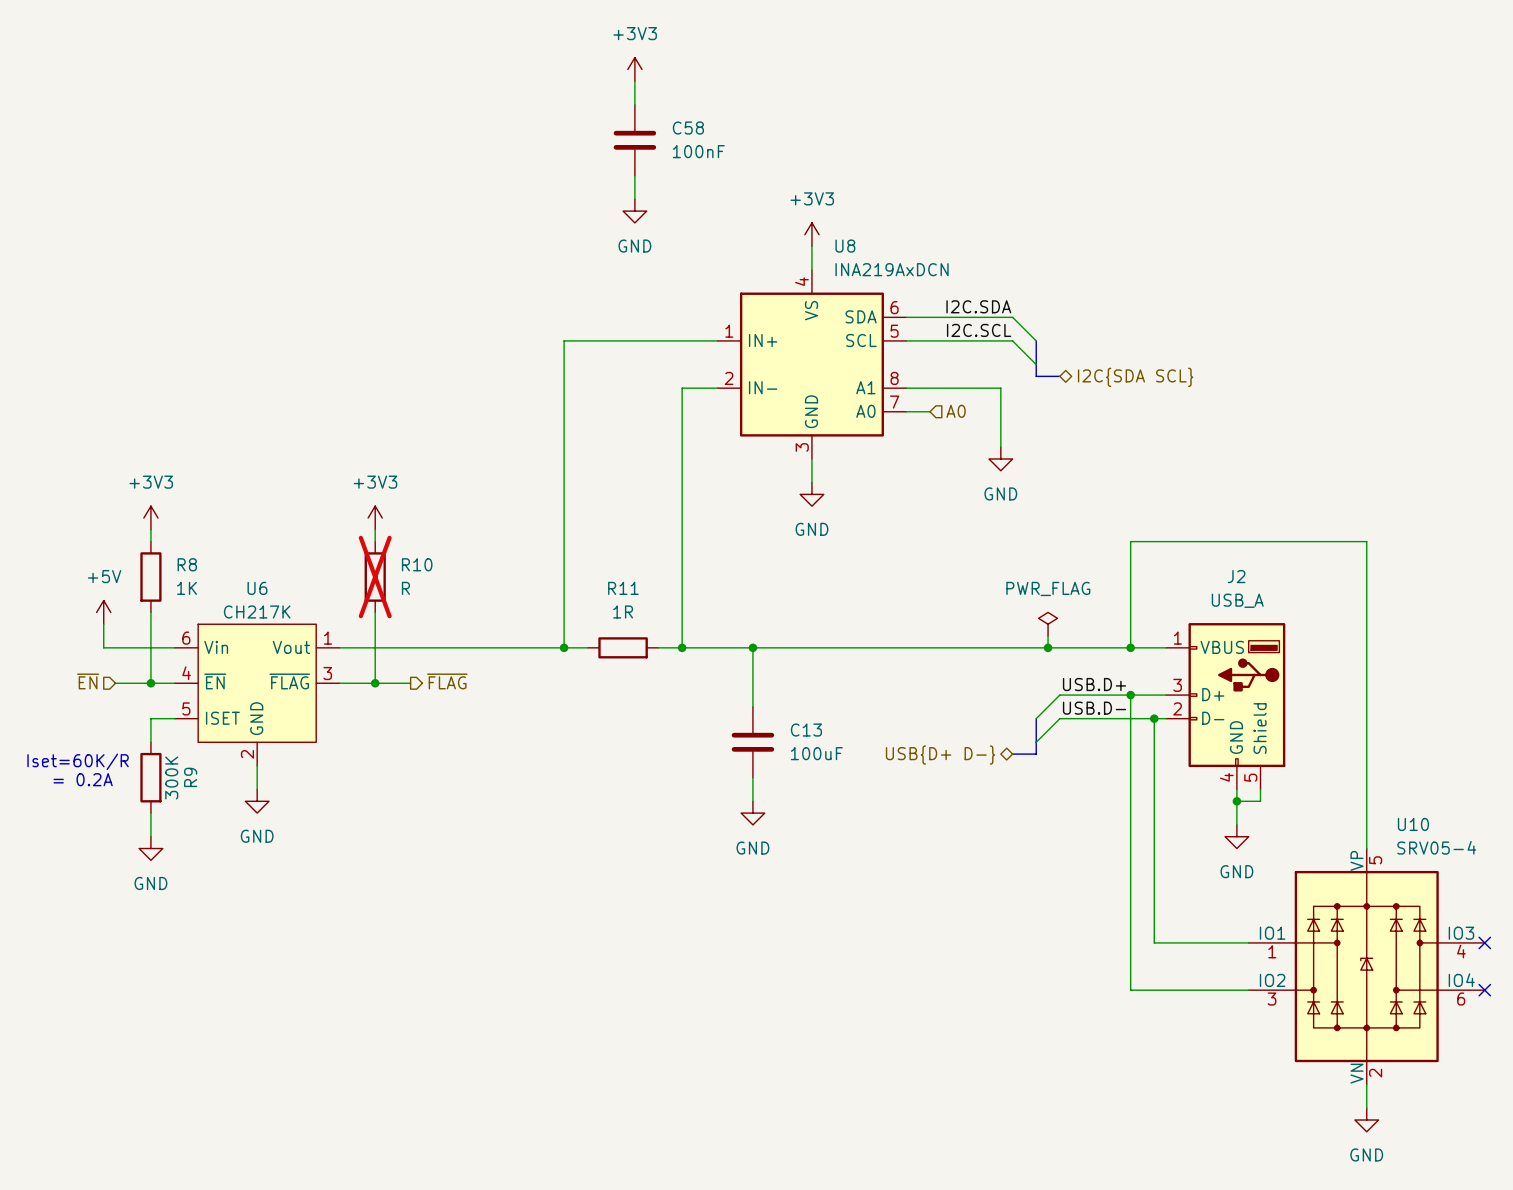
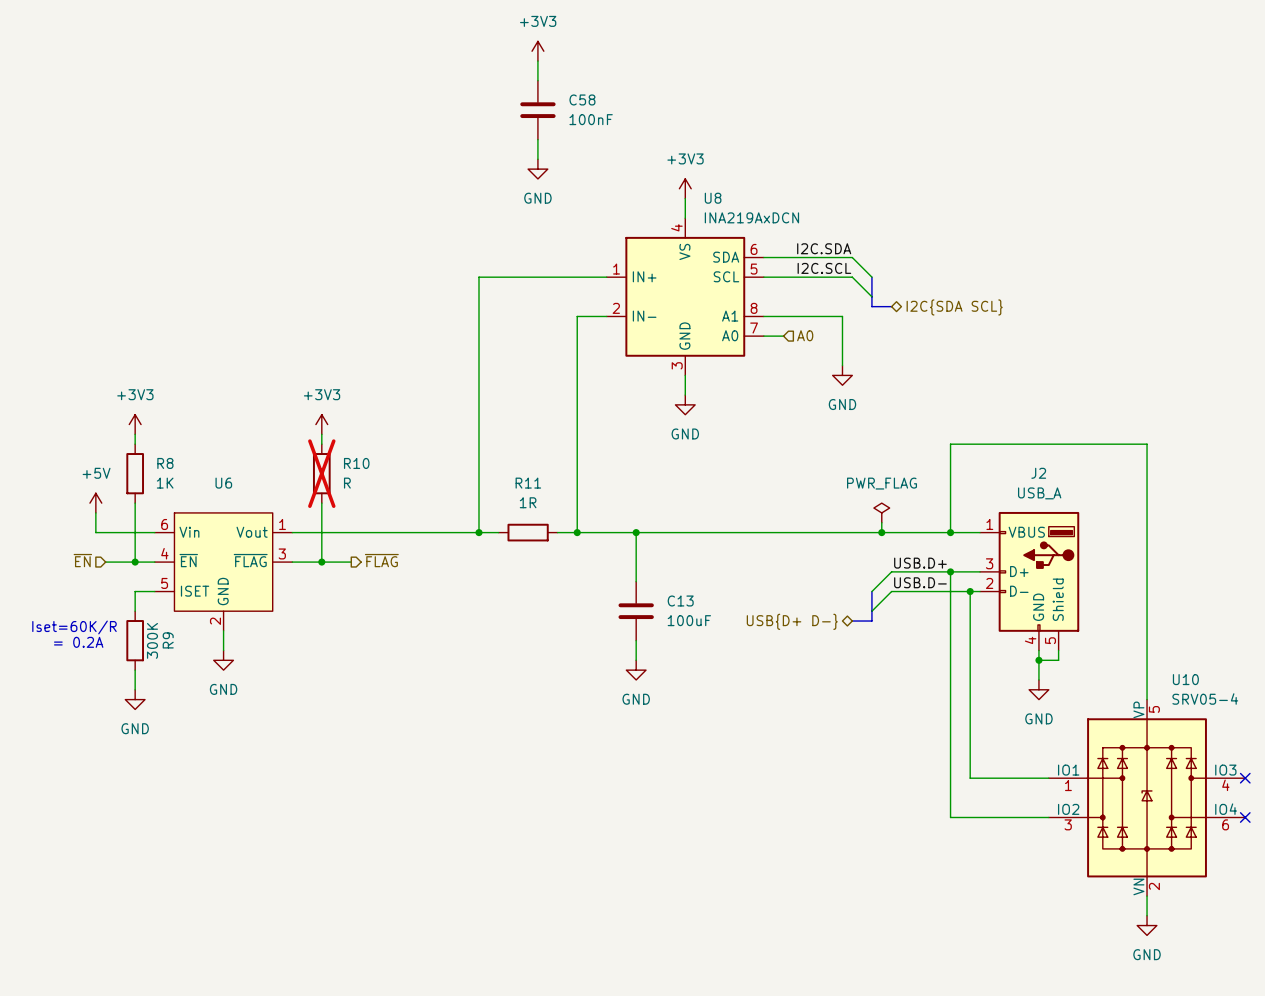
U6 value: CH217K (257, 611) -> none

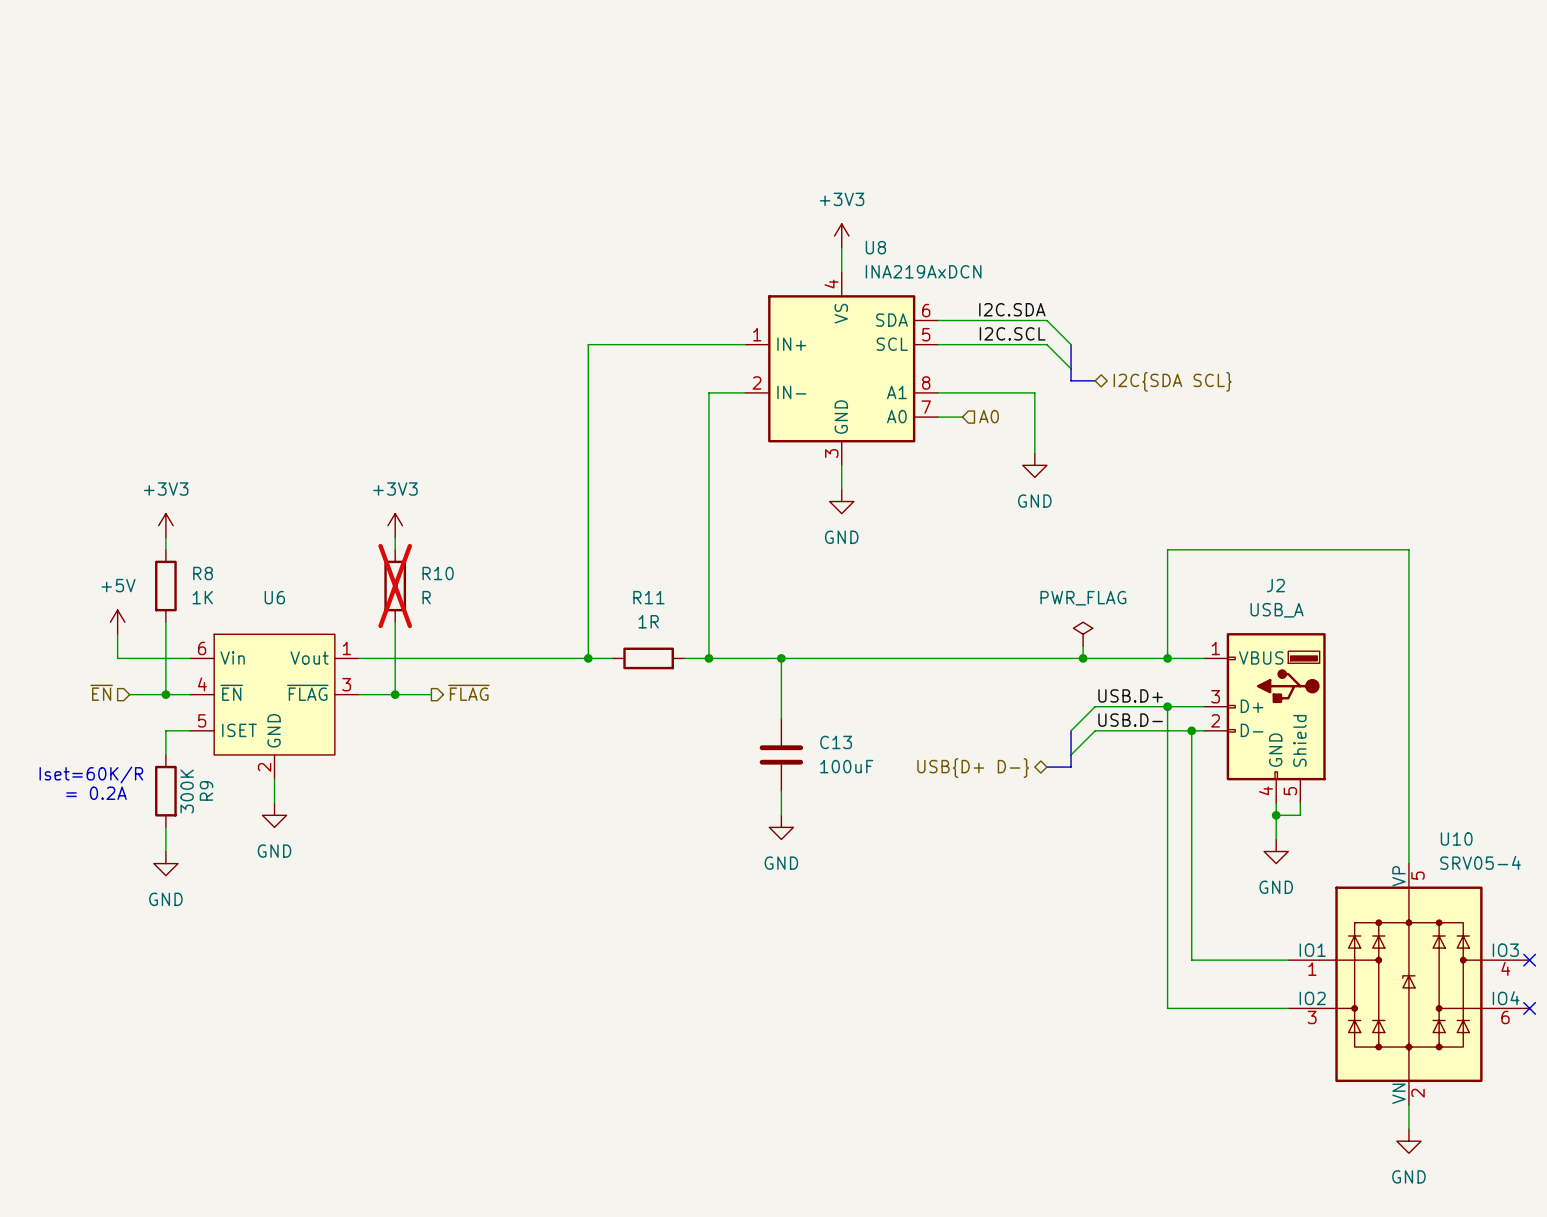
power symbol: +3V3 (537, 51) -> none
wire: (537, 61) (537, 80) -> none
C58: 100nF (537, 110) -> none
wire: (537, 139) (537, 159) -> none
power symbol: GND (537, 169) -> none

